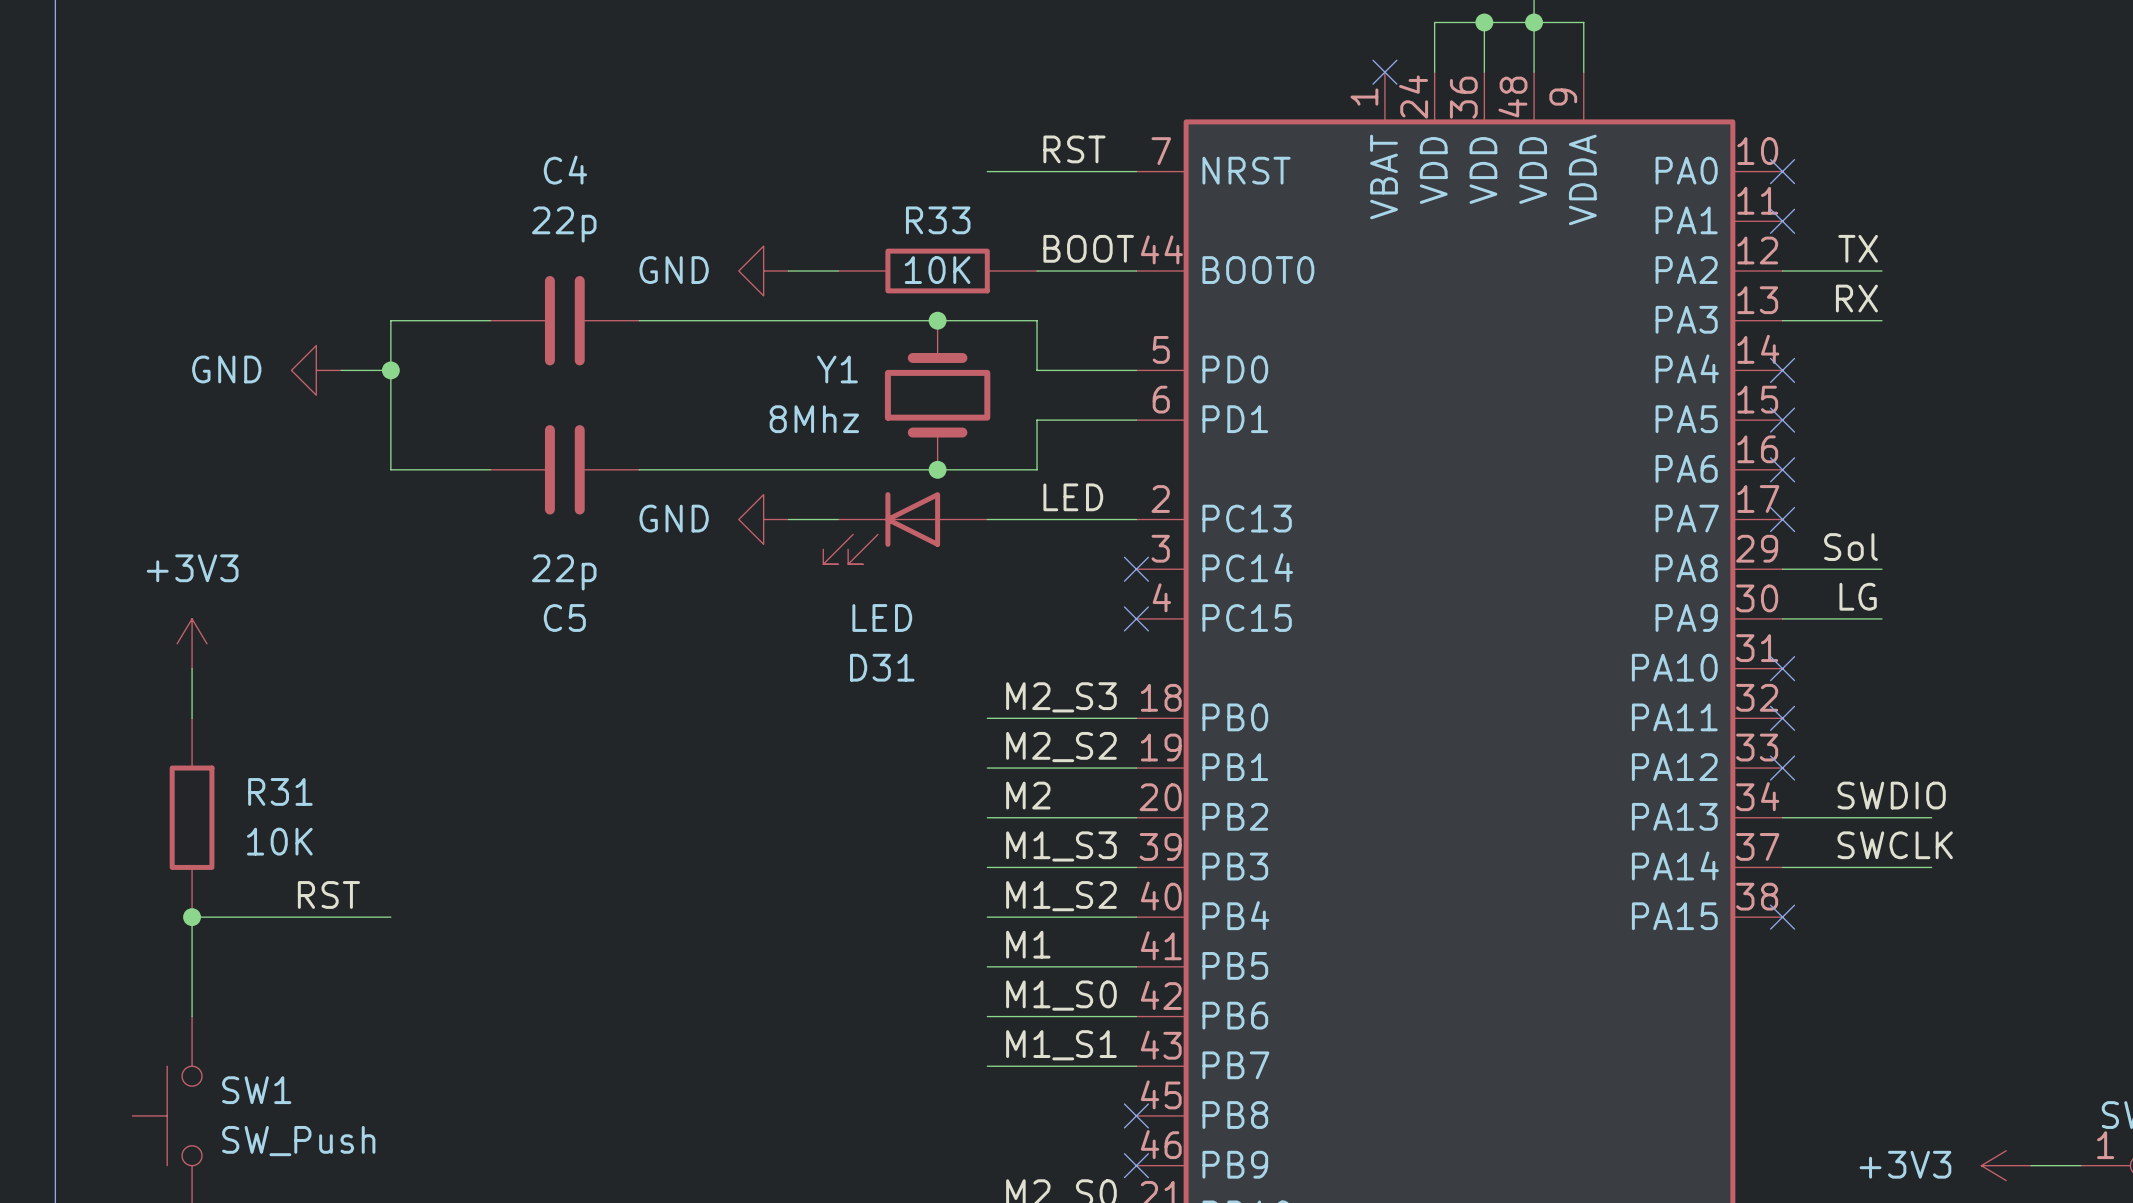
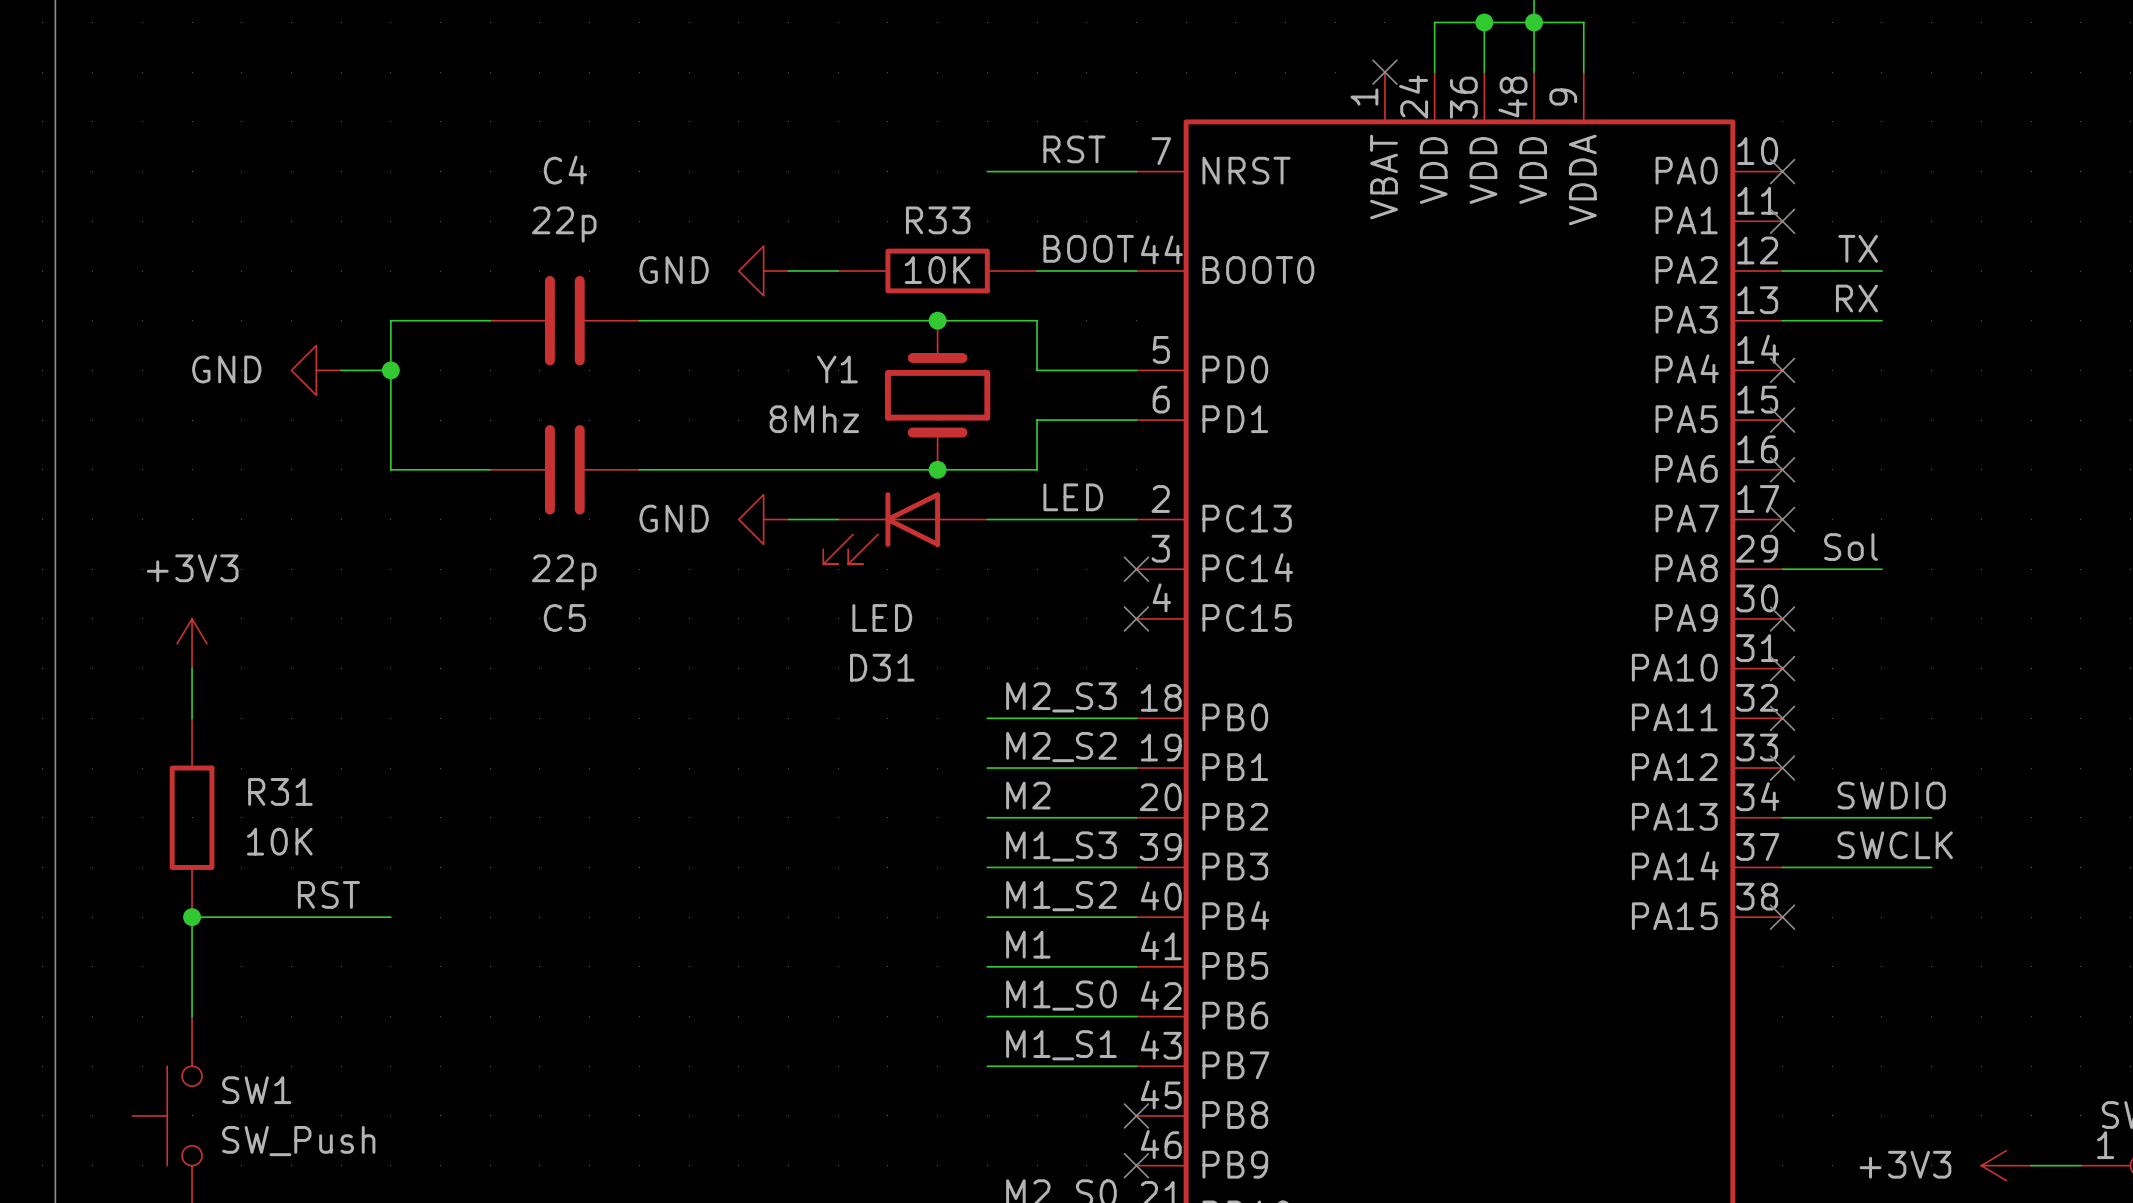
label: LG (1858, 596) -> none
wire: (1782, 618) (1881, 618) -> none
no-connect mark: none -> (1782, 618)

